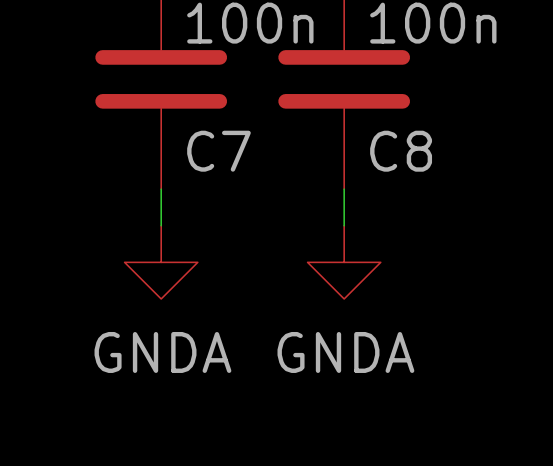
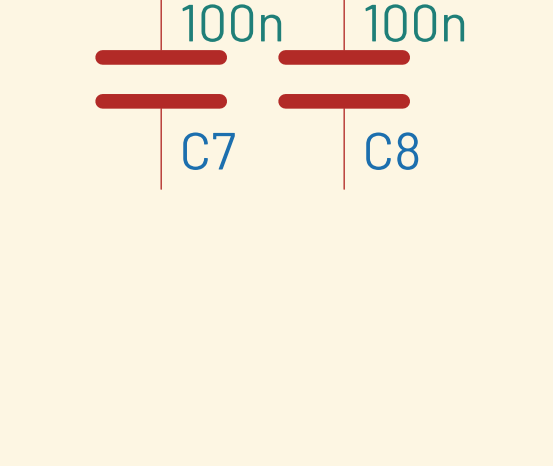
wire: (161, 189) (161, 225) -> none
wire: (344, 189) (344, 225) -> none
power symbol: GNDA (161, 262) -> none
power symbol: GNDA (344, 262) -> none

